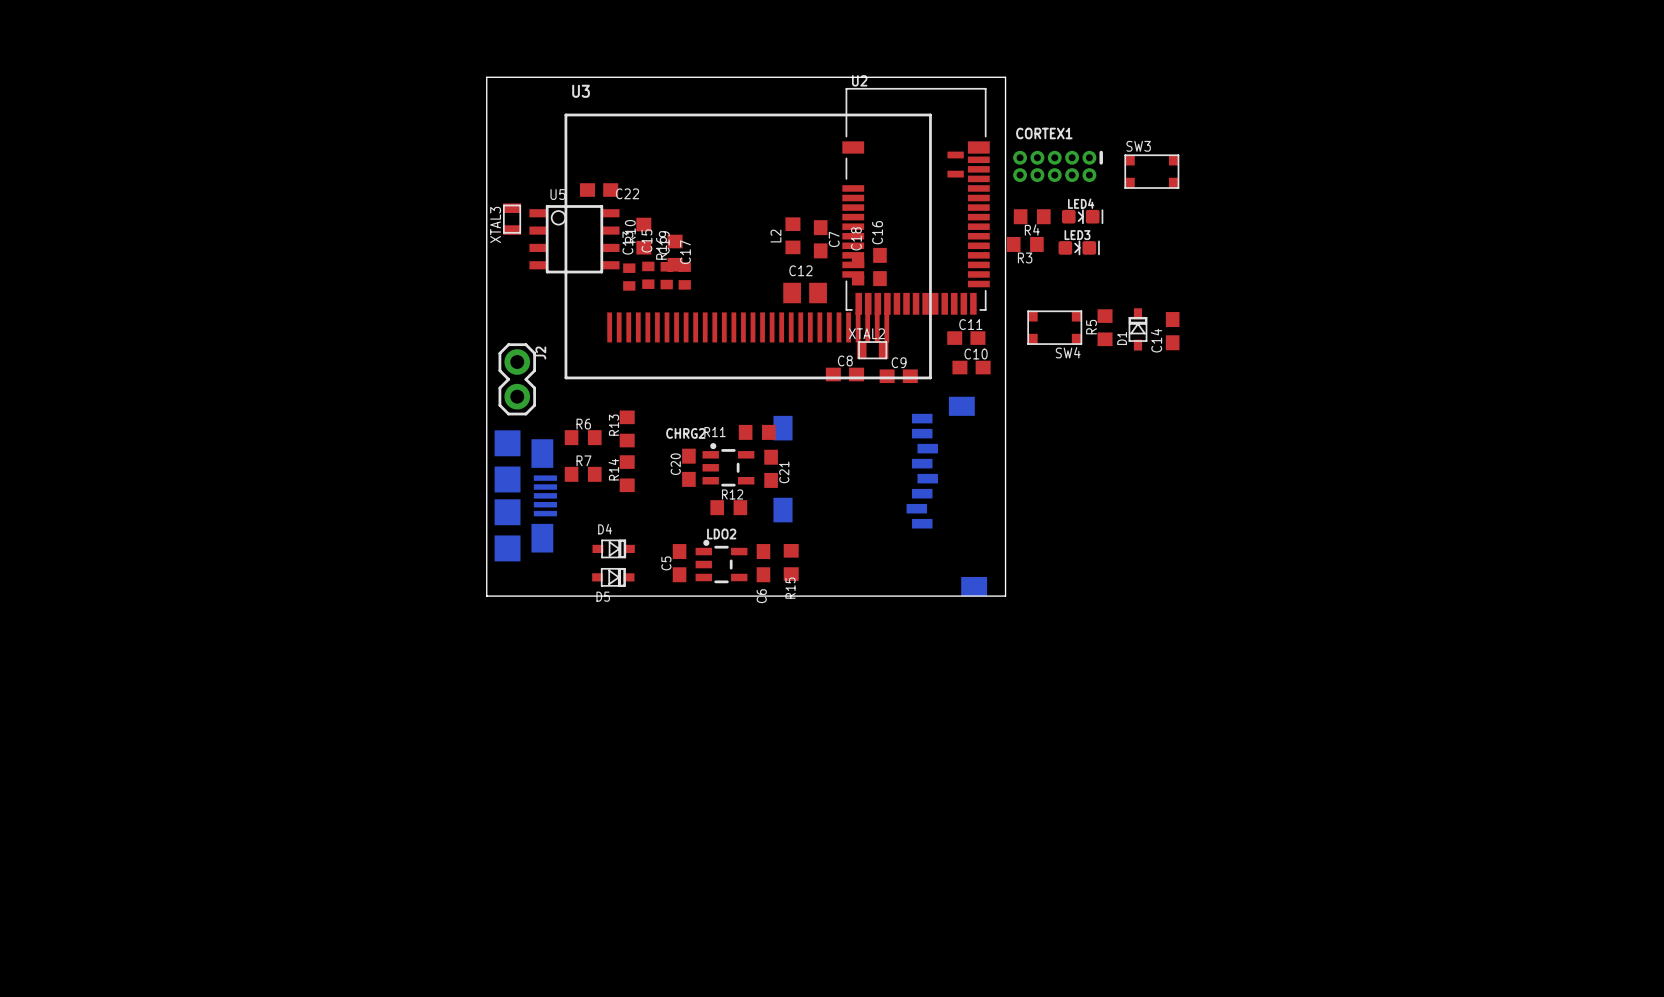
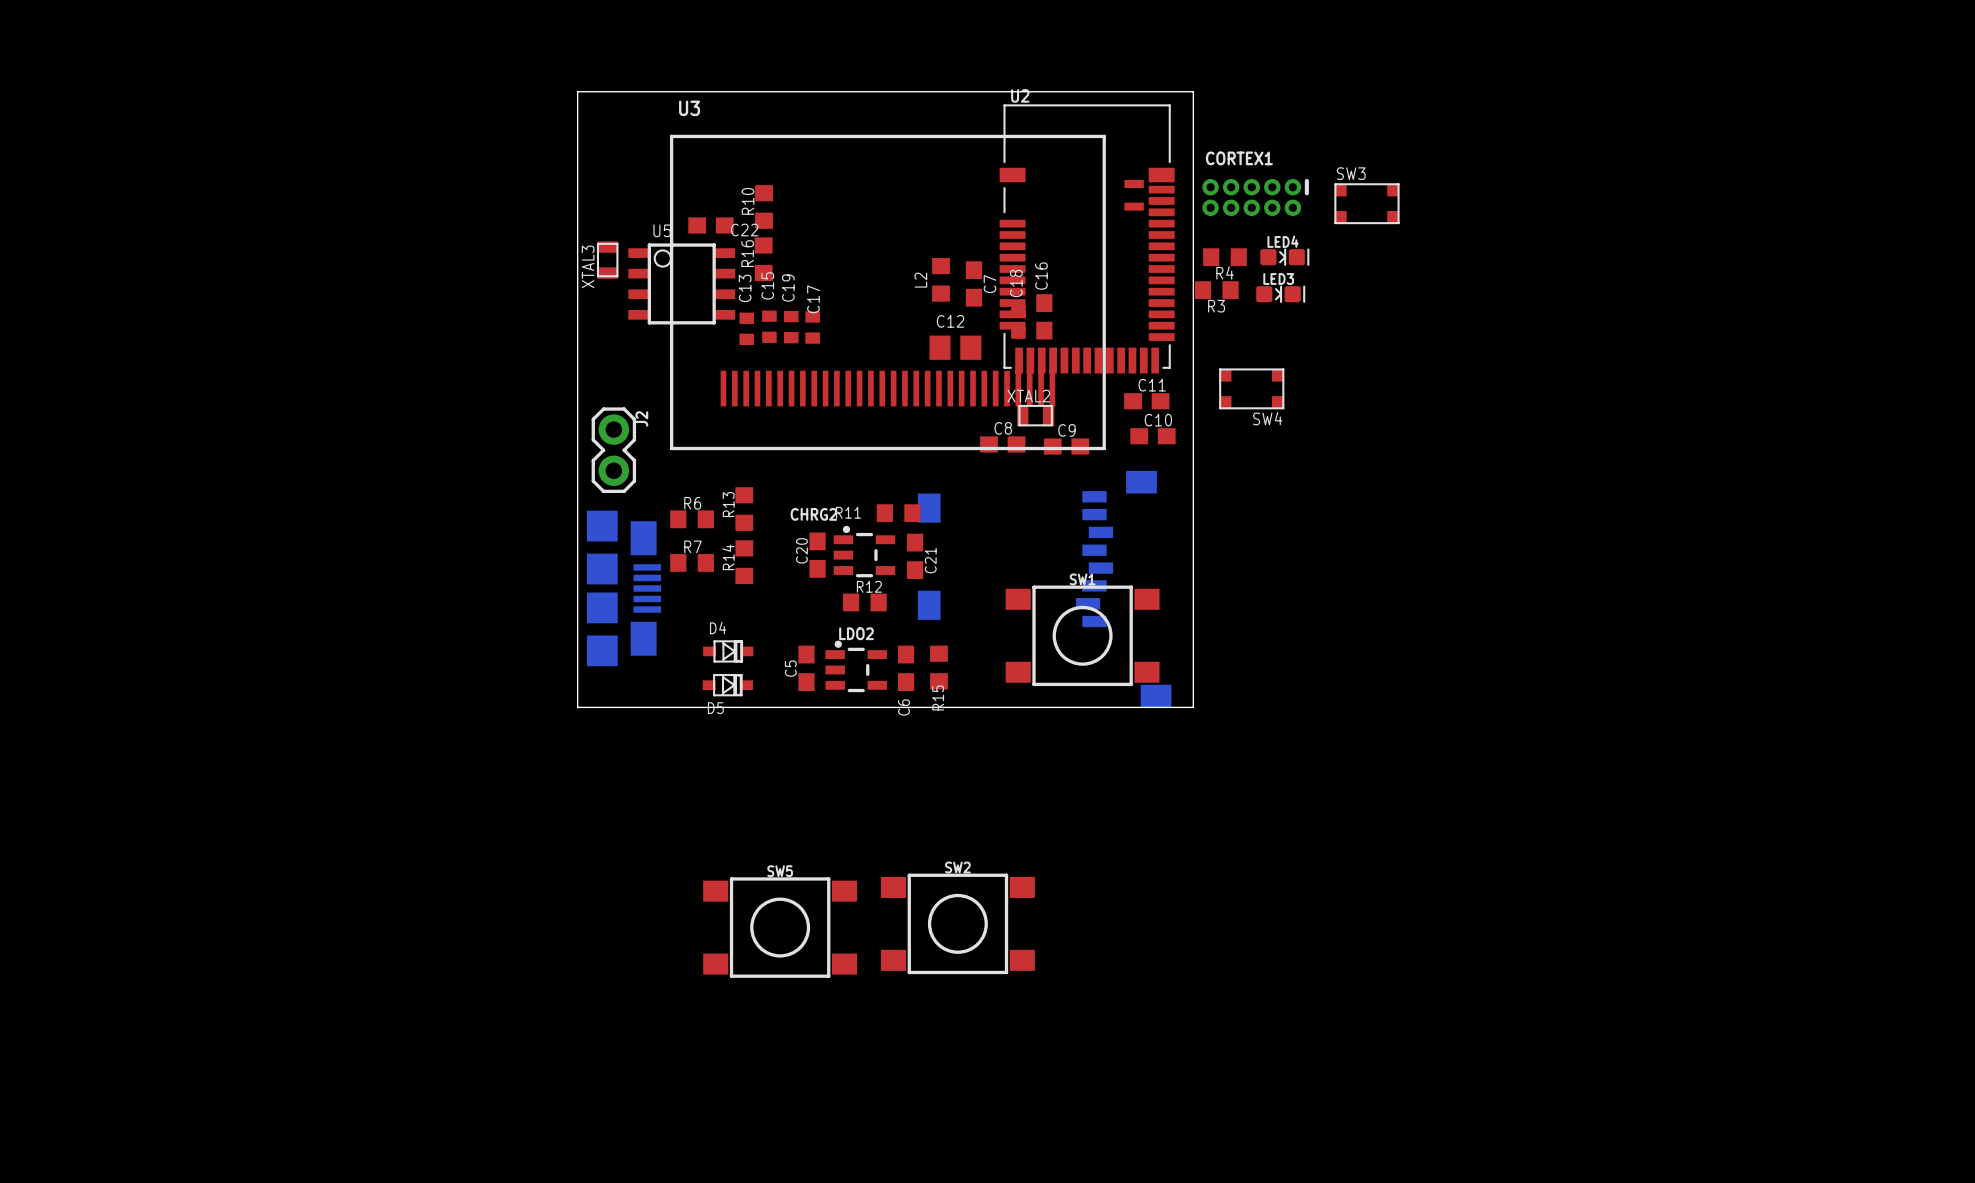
R10 position: (643, 236) -> (764, 206)
R16 position: (675, 253) -> (763, 259)
R5: (1105, 327) -> none
D1: (1137, 329) -> none
C14: (1172, 331) -> none
SW1: none -> (1082, 635)
SW2: none -> (957, 923)
SW5: none -> (780, 927)

